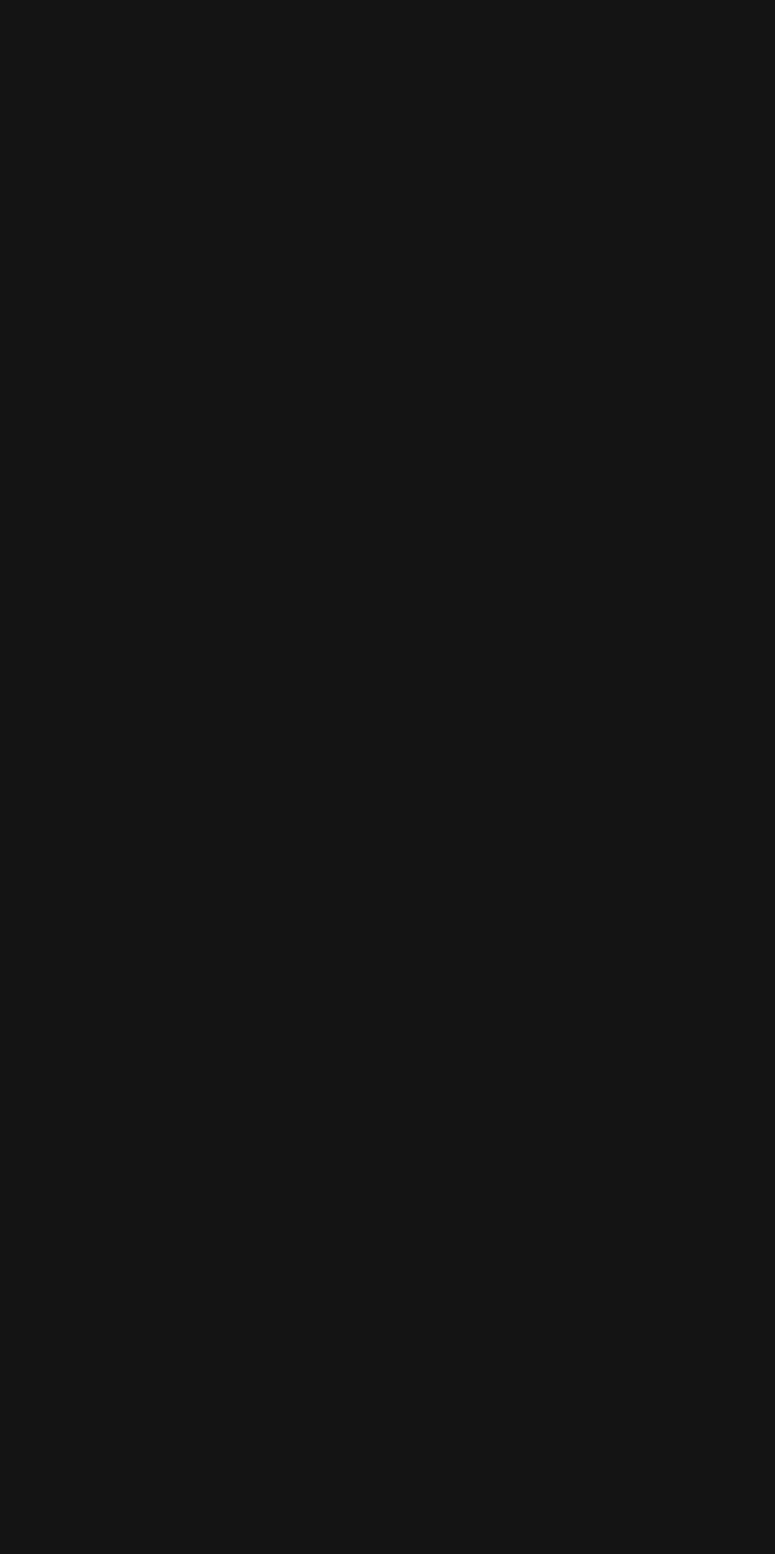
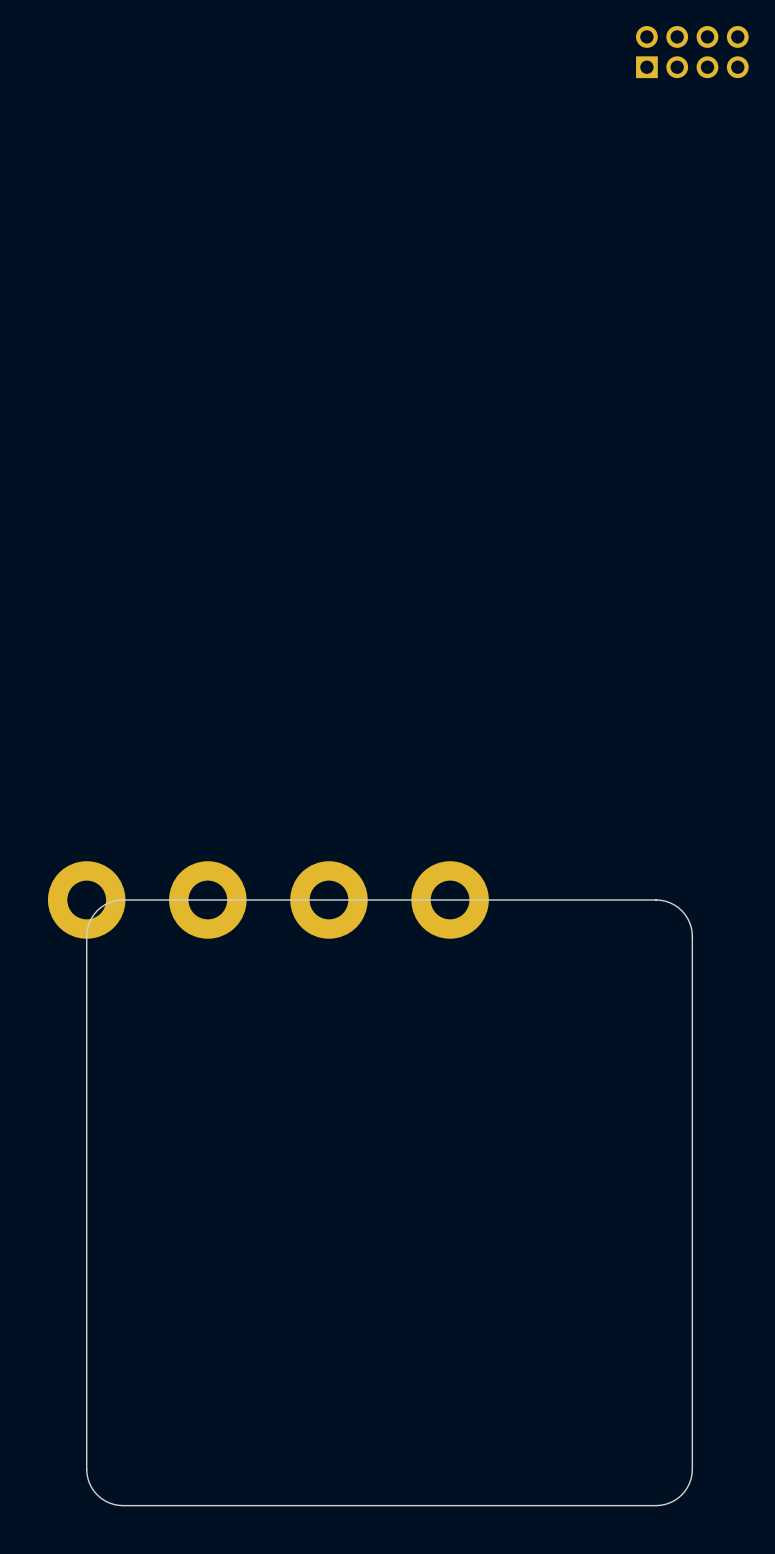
part: none -> (692, 52)
part: none -> (86, 899)
part: none -> (207, 899)
part: none -> (328, 899)
part: none -> (450, 899)
board edge: none -> (656, 899) (123, 899) (109, 902) (97, 910) (89, 922) (86, 936) (86, 1469) (89, 1483) (97, 1494) (109, 1502) (123, 1505) (656, 1505) (669, 1502) (681, 1494) (689, 1483) (692, 1469) (692, 936) (689, 922) (681, 910) (669, 902) (656, 899)

